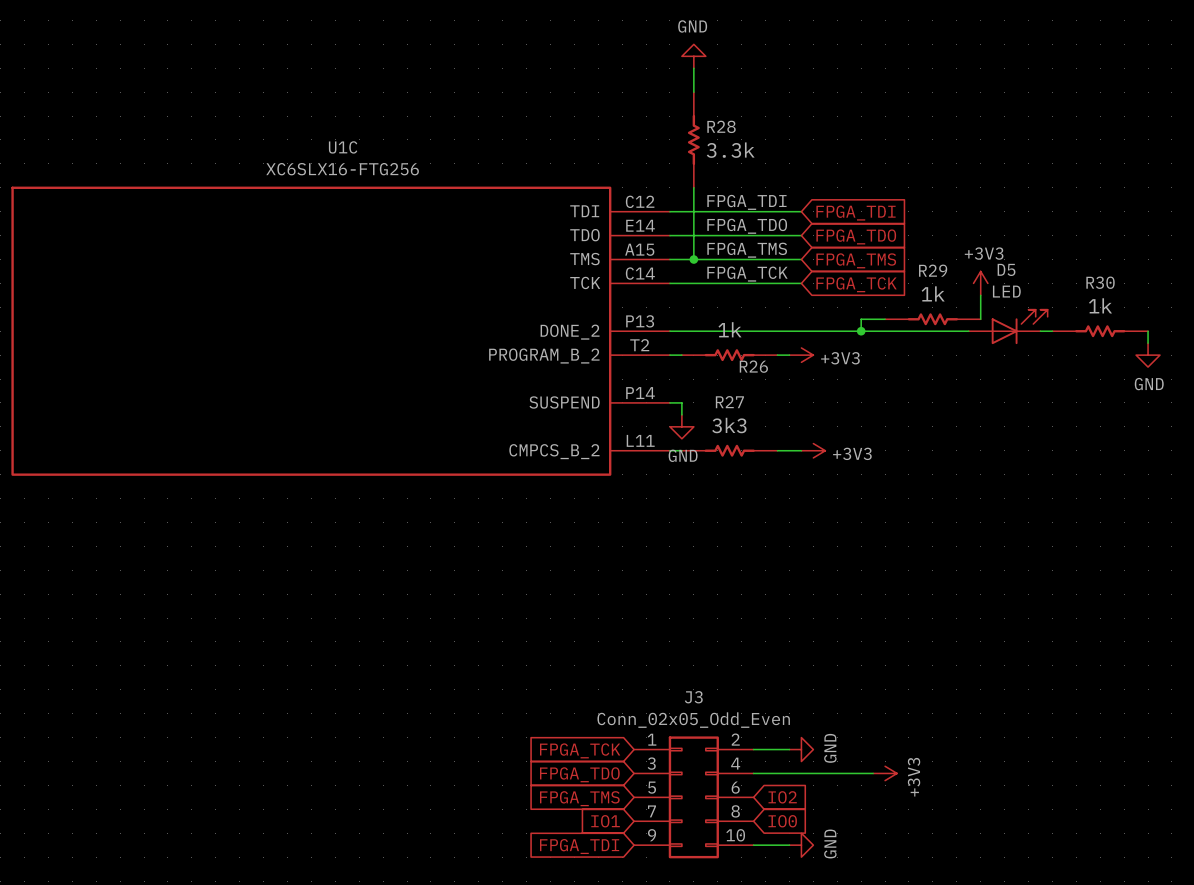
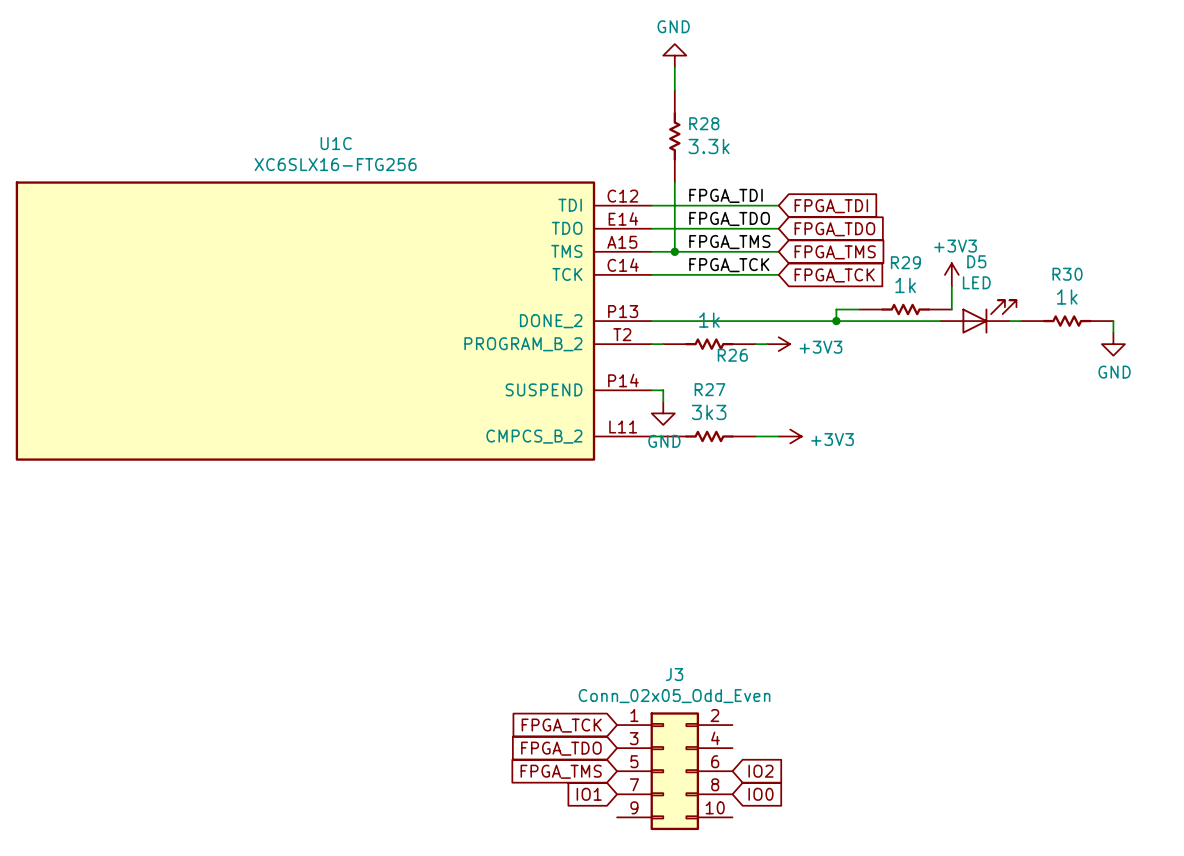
wire: (753, 749) (789, 749) -> none
power symbol: GND (801, 749) -> none
wire: (753, 773) (873, 773) -> none
power symbol: +3V3 (885, 773) -> none
wire: (753, 845) (789, 845) -> none
power symbol: GND (801, 845) -> none
global label: FPGA_TDI (579, 846) -> none

